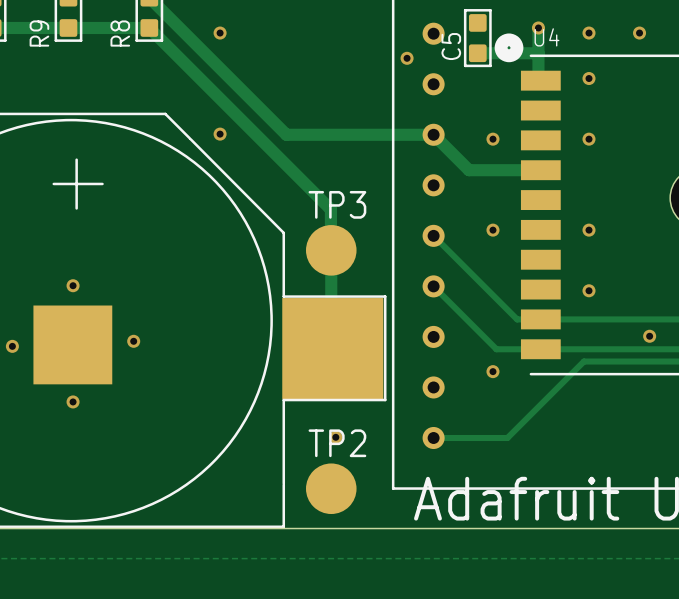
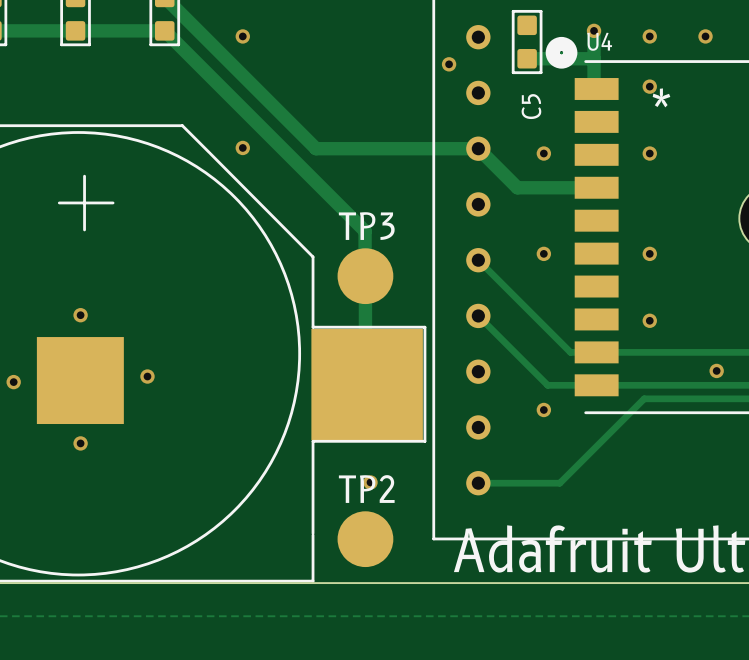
R9 name: R9 (39, 33) -> none
R8 name: R8 (120, 33) -> none
C5 name position: C5 (451, 46) -> C5 (531, 106)
U4 text: none -> * (661, 97)

